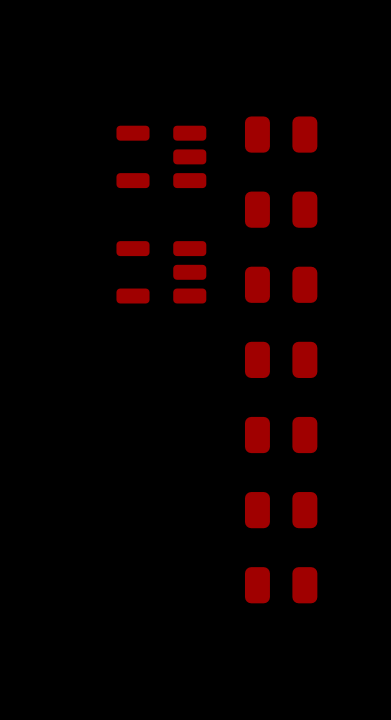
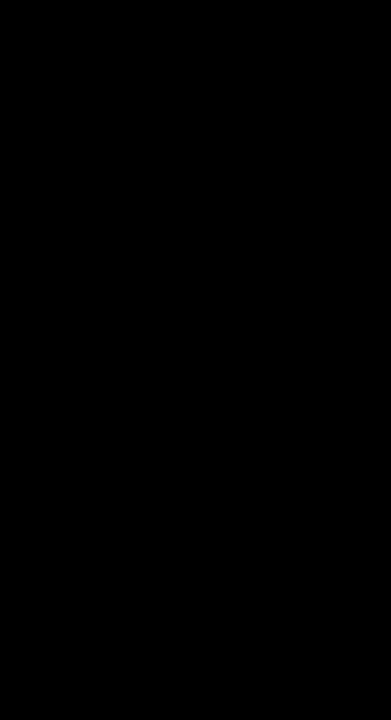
part: (281, 134) -> none
part: (161, 156) -> none
part: (281, 209) -> none
part: (161, 272) -> none
part: (281, 284) -> none
part: (281, 359) -> none
part: (281, 435) -> none
part: (281, 510) -> none
part: (281, 585) -> none

